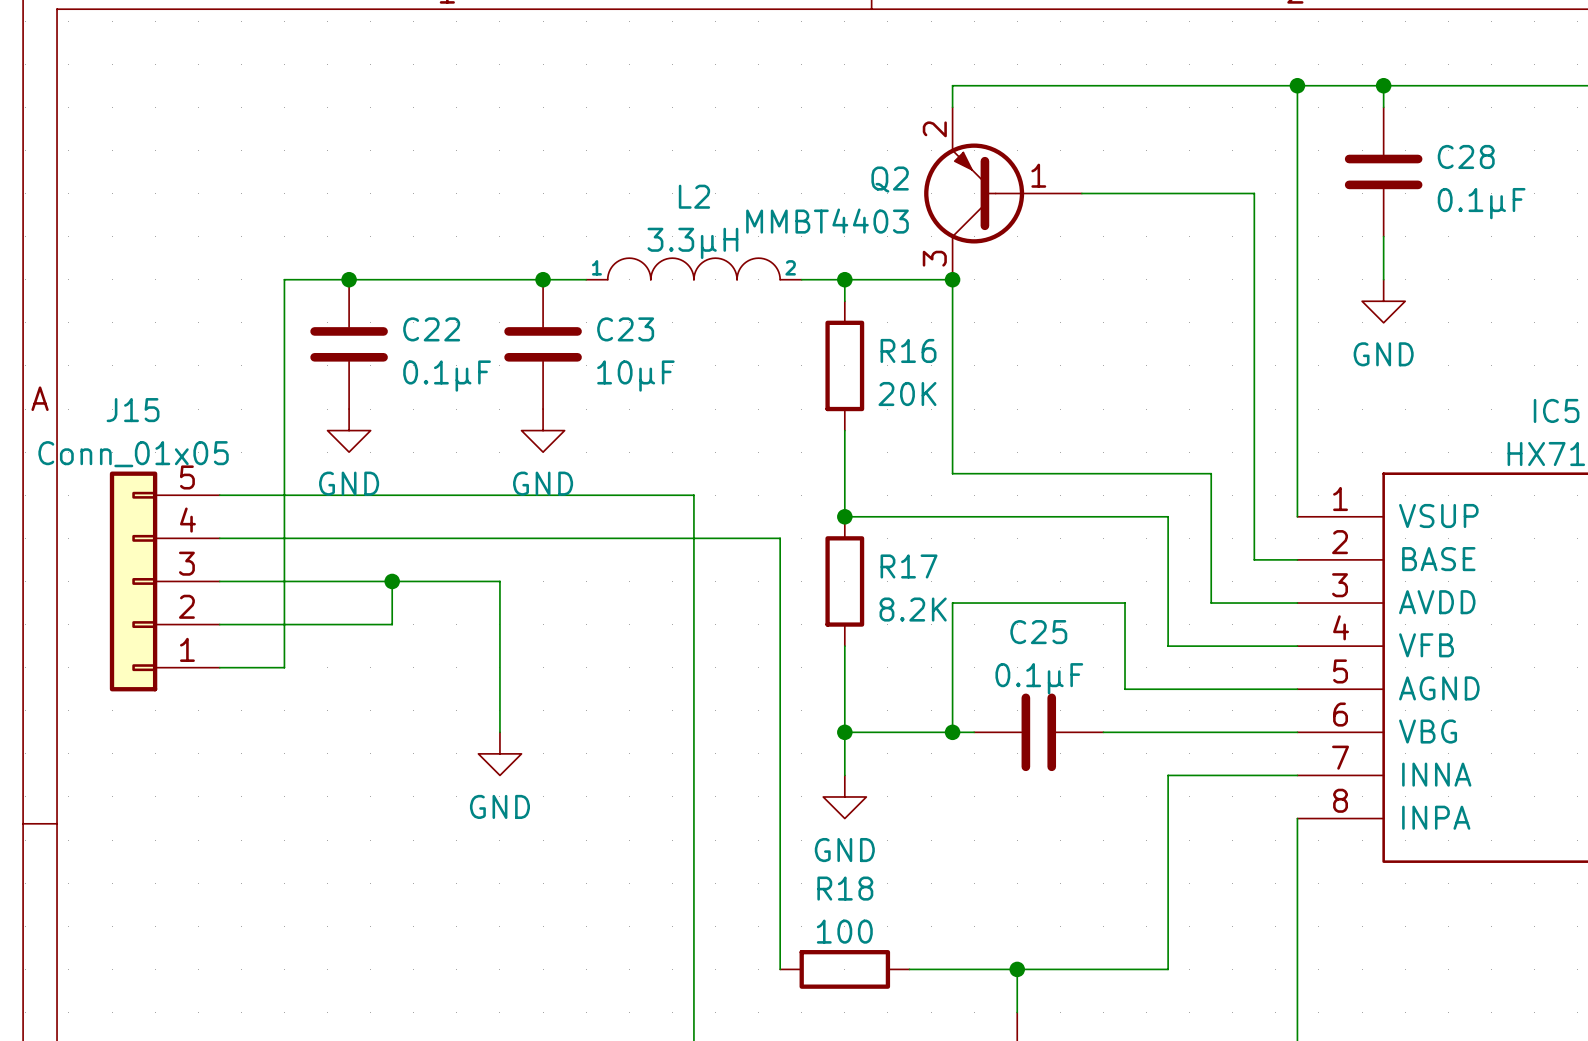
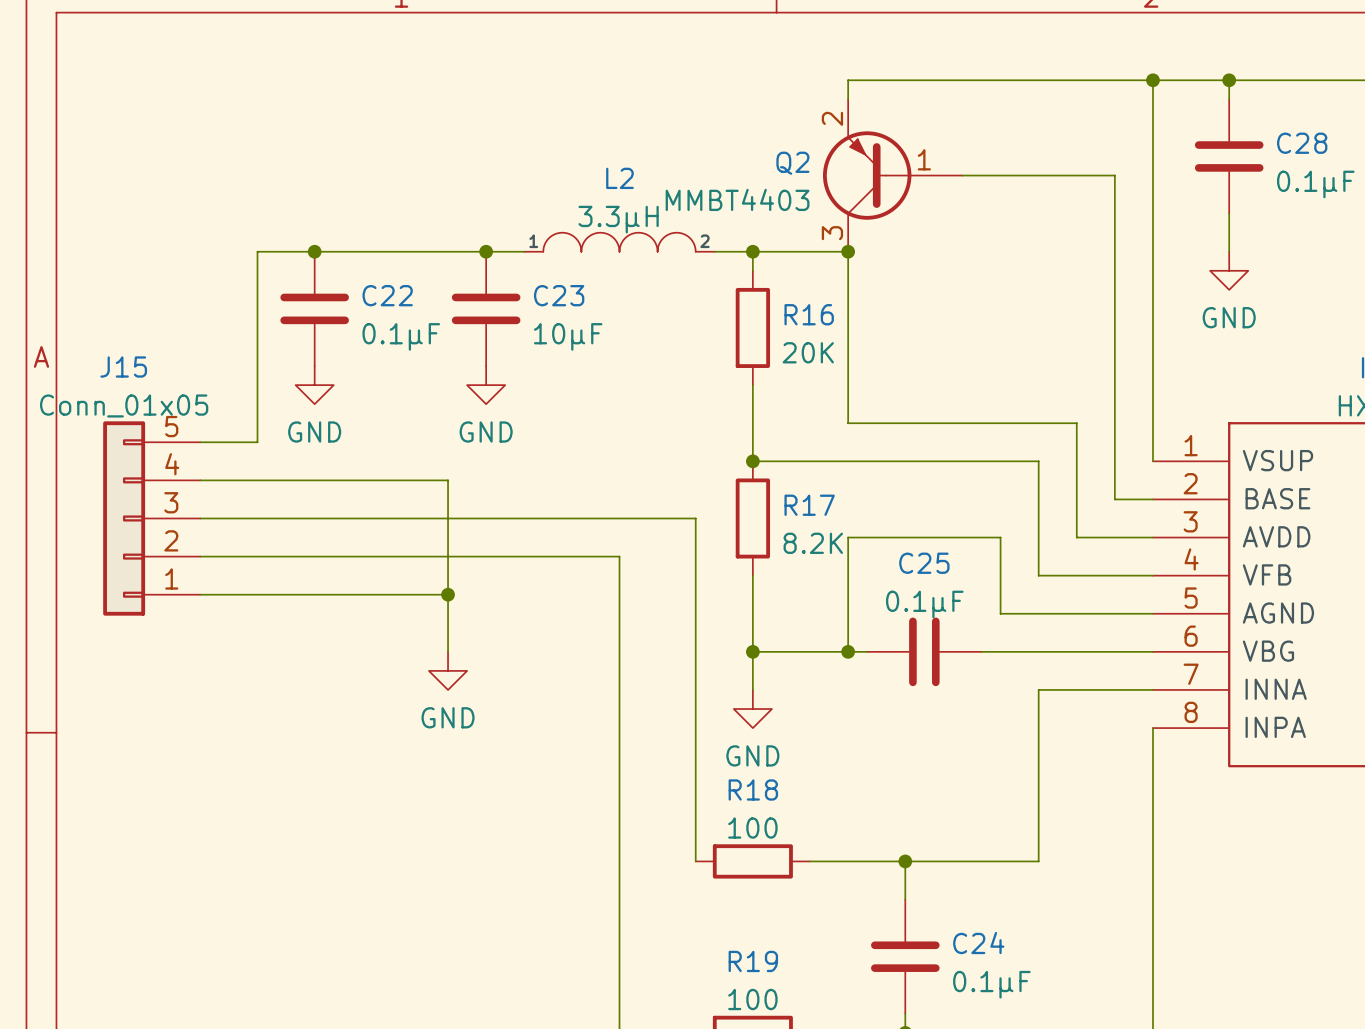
wire: (499, 538) (780, 538) (780, 581) -> (448, 480) (448, 518) (695, 518)
wire: (392, 581) (392, 624) -> none
junction: (392, 581) -> none
wire: (693, 624) (693, 495) (284, 495) (284, 667) -> (619, 556) (352, 556)
wire: none -> (257, 594) (448, 594)
junction: none -> (448, 594)

